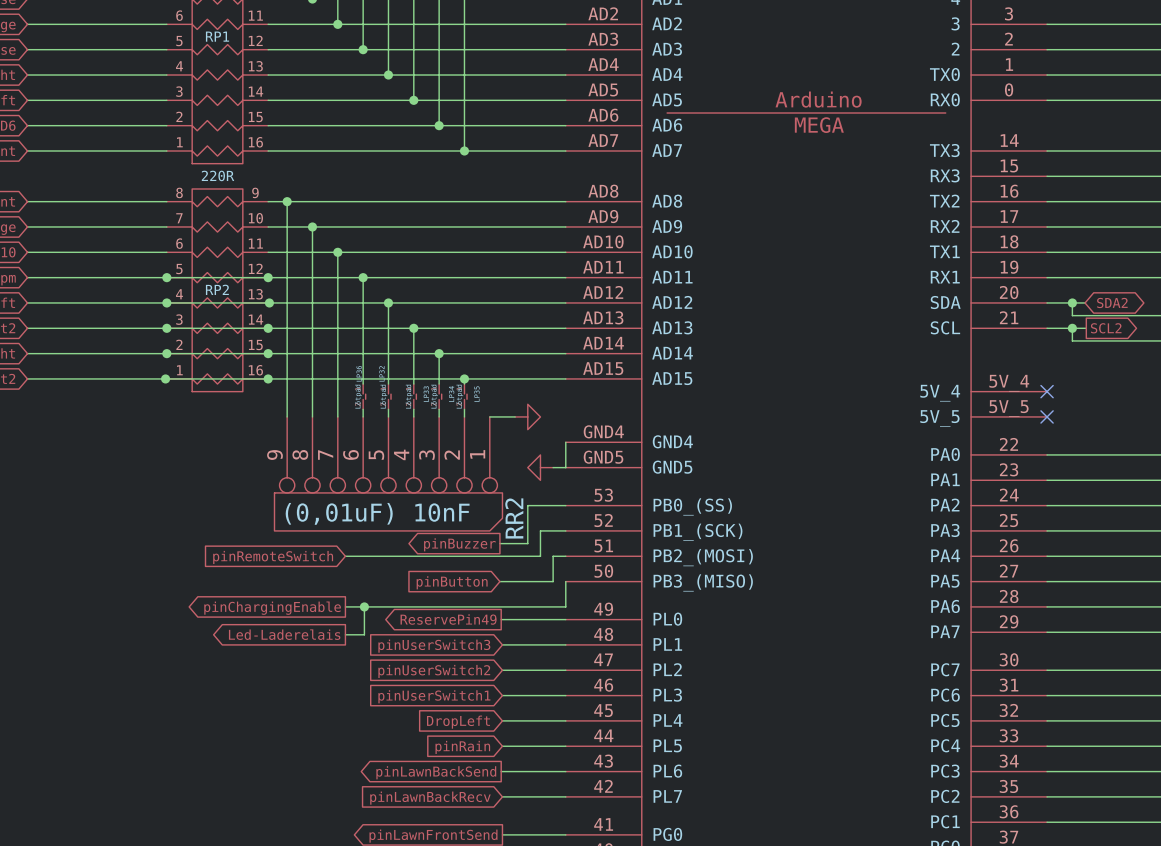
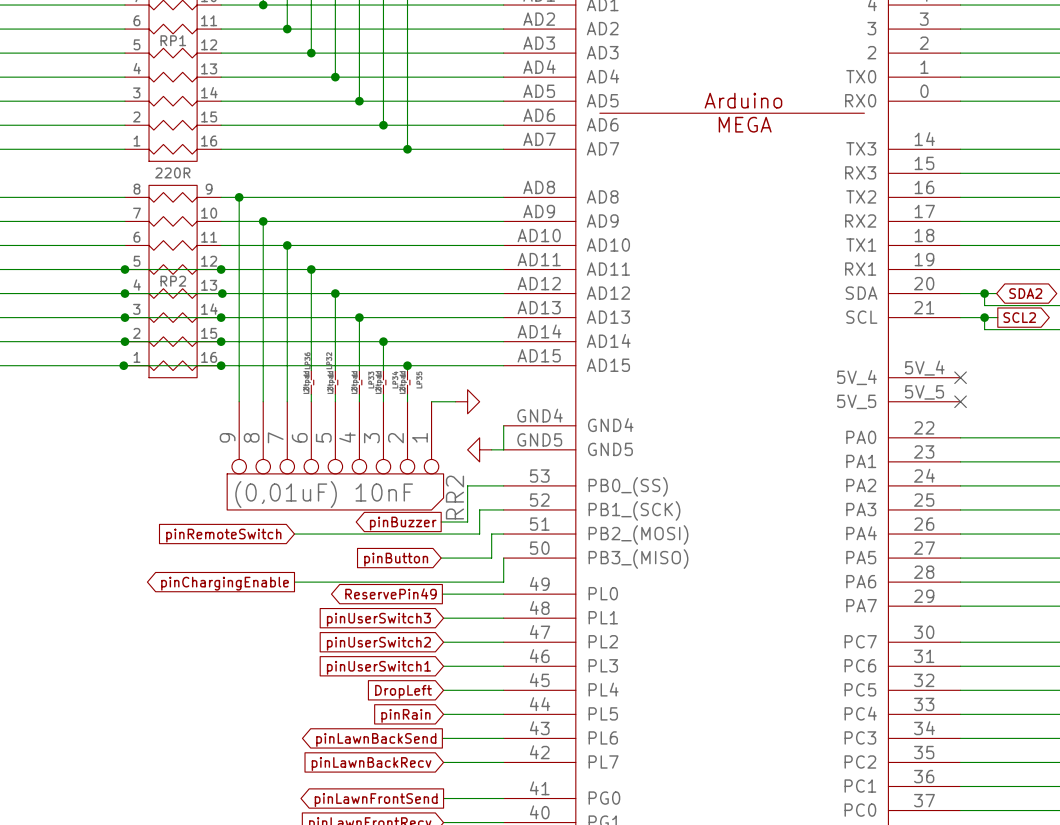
wire: (364, 606) (364, 634) (345, 634) -> none
junction: (364, 606) -> none
global label: Led-Laderelais (284, 634) -> none

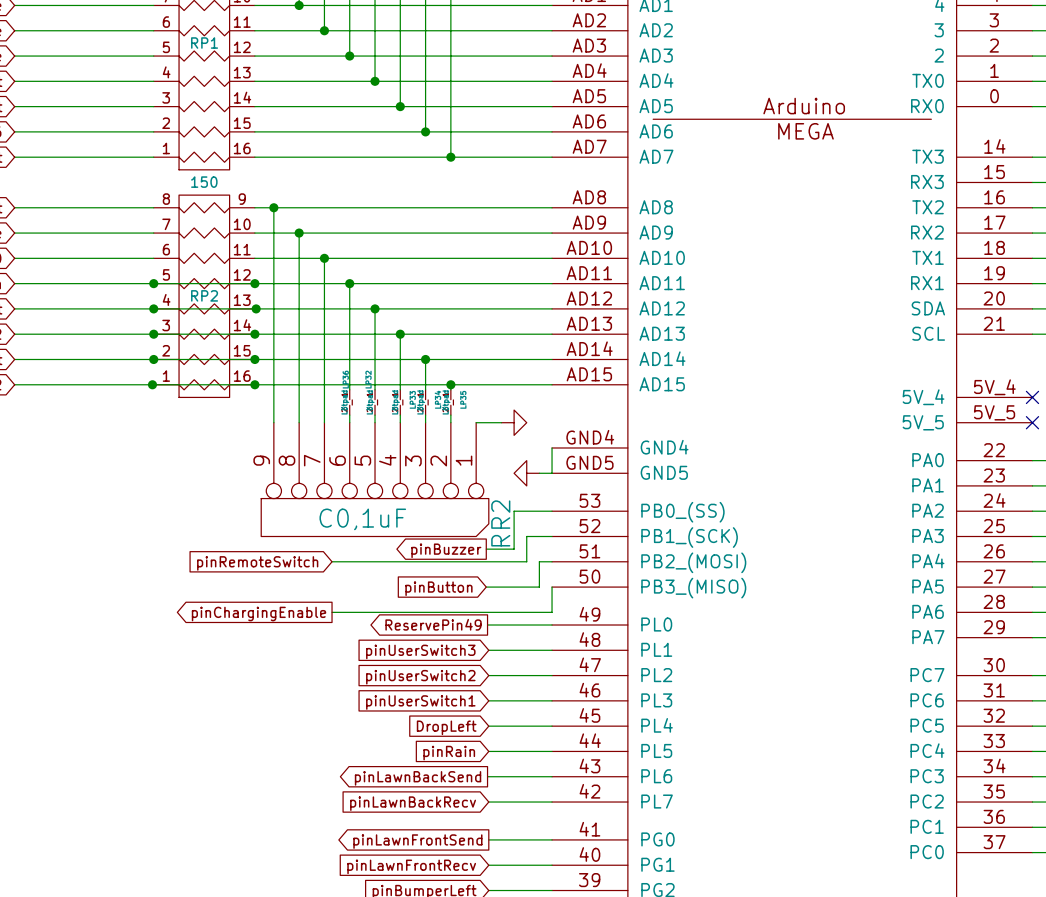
RP2 value: 220R (172, 172) -> 150 (204, 182)
RR2 value: (0,01uF) 10nF (324, 494) -> C0,1uF (362, 519)

